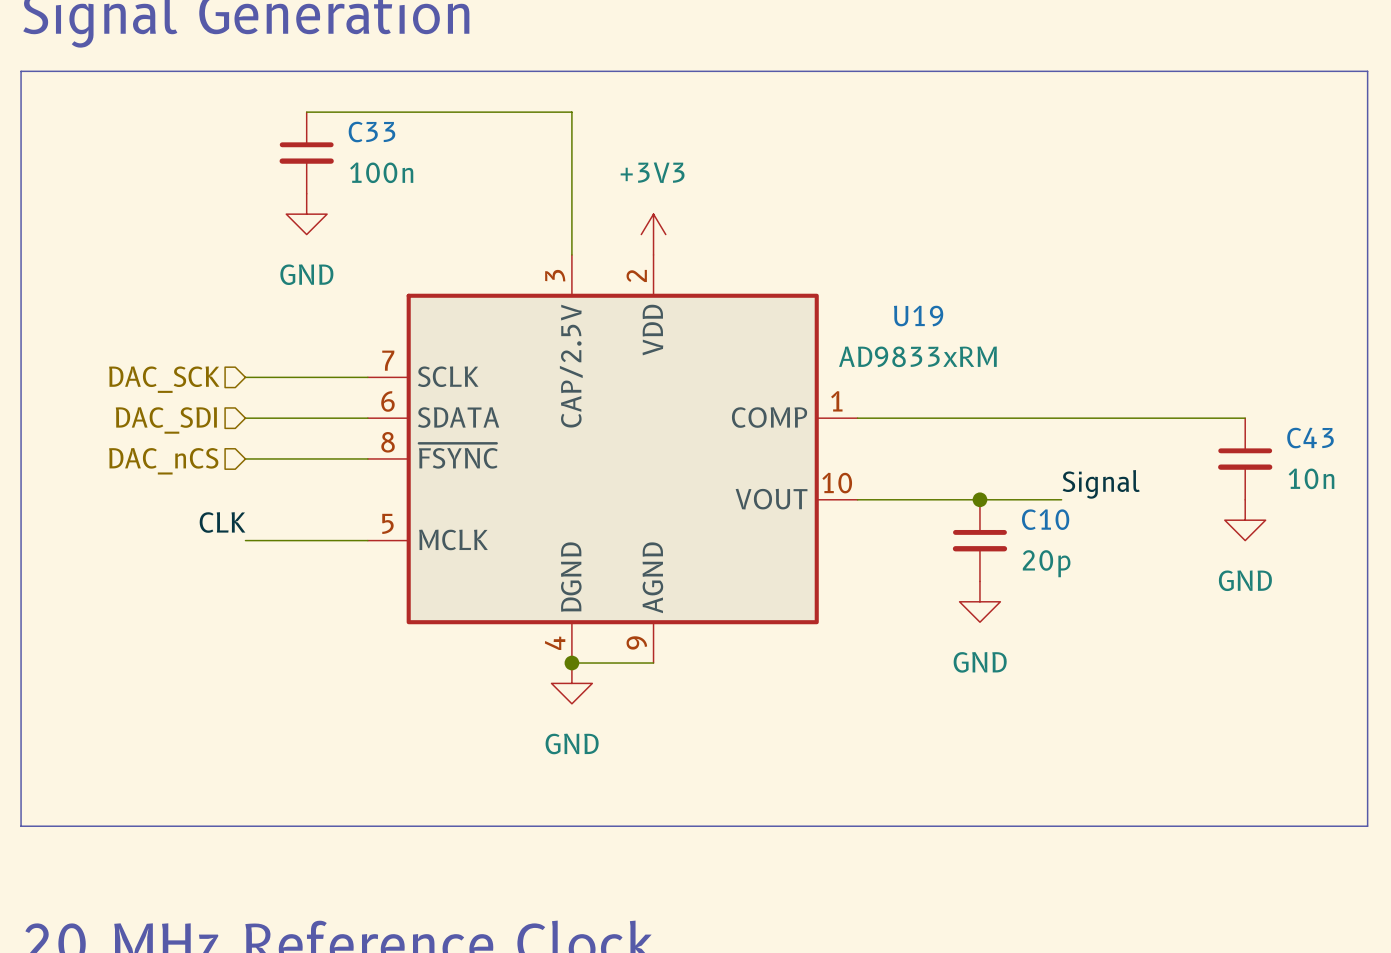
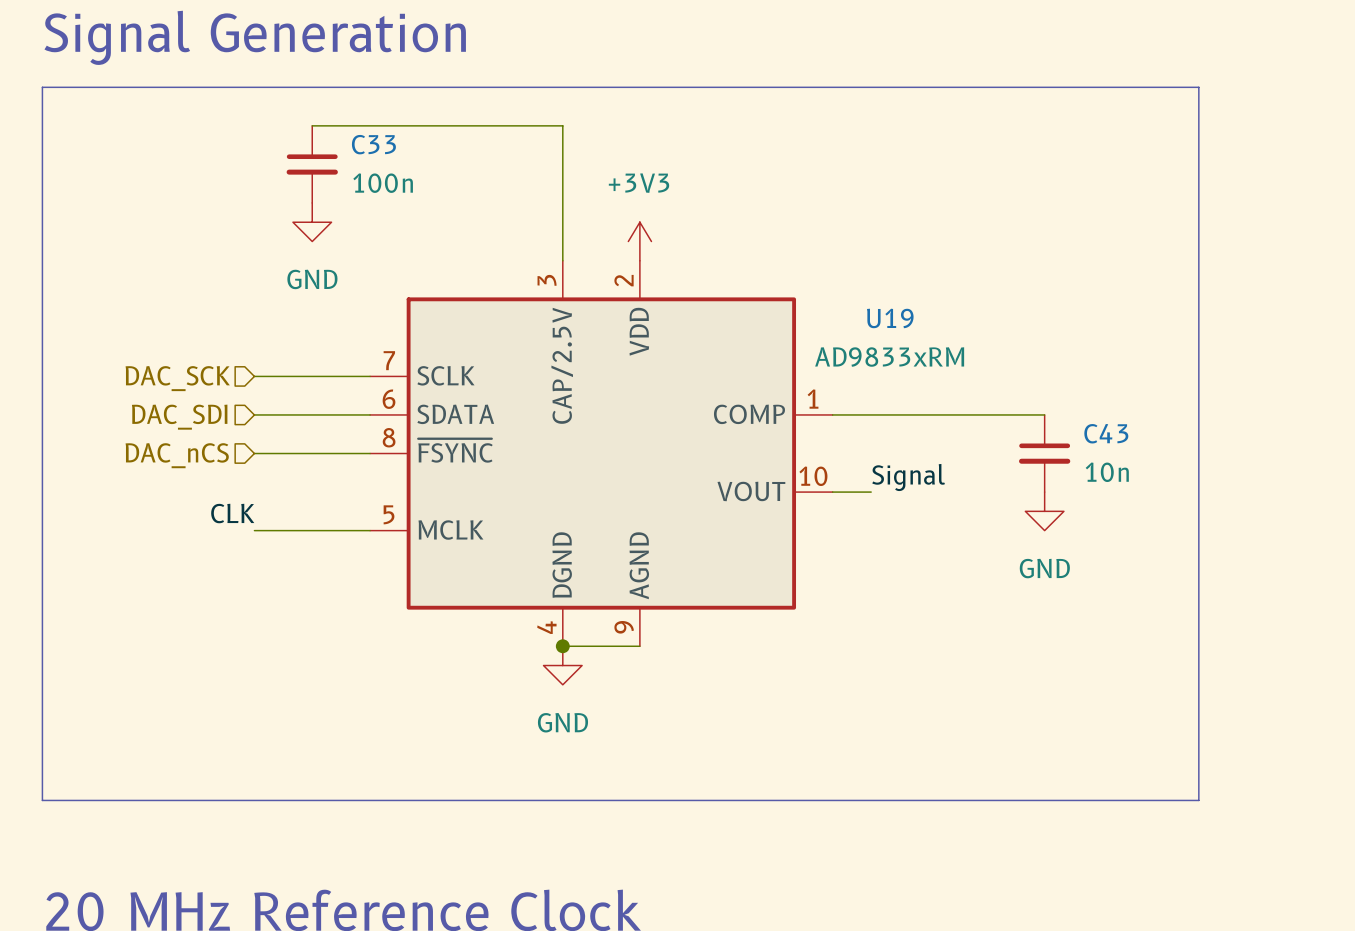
line: (1245, 71) (1367, 71) (1367, 826) (1245, 826) -> (1198, 87) (1198, 800)
wire: (1081, 418) (1245, 418) -> none
C43 position: (1245, 458) -> (1044, 453)
label position: Signal (1101, 484) -> Signal (908, 477)
wire: (898, 499) (1061, 499) -> none
junction: (979, 499) -> none
power symbol: none -> GND (1044, 511)
power symbol: GND (1245, 520) -> none
C10: 20p (979, 540) -> none
power symbol: GND (979, 601) -> none

